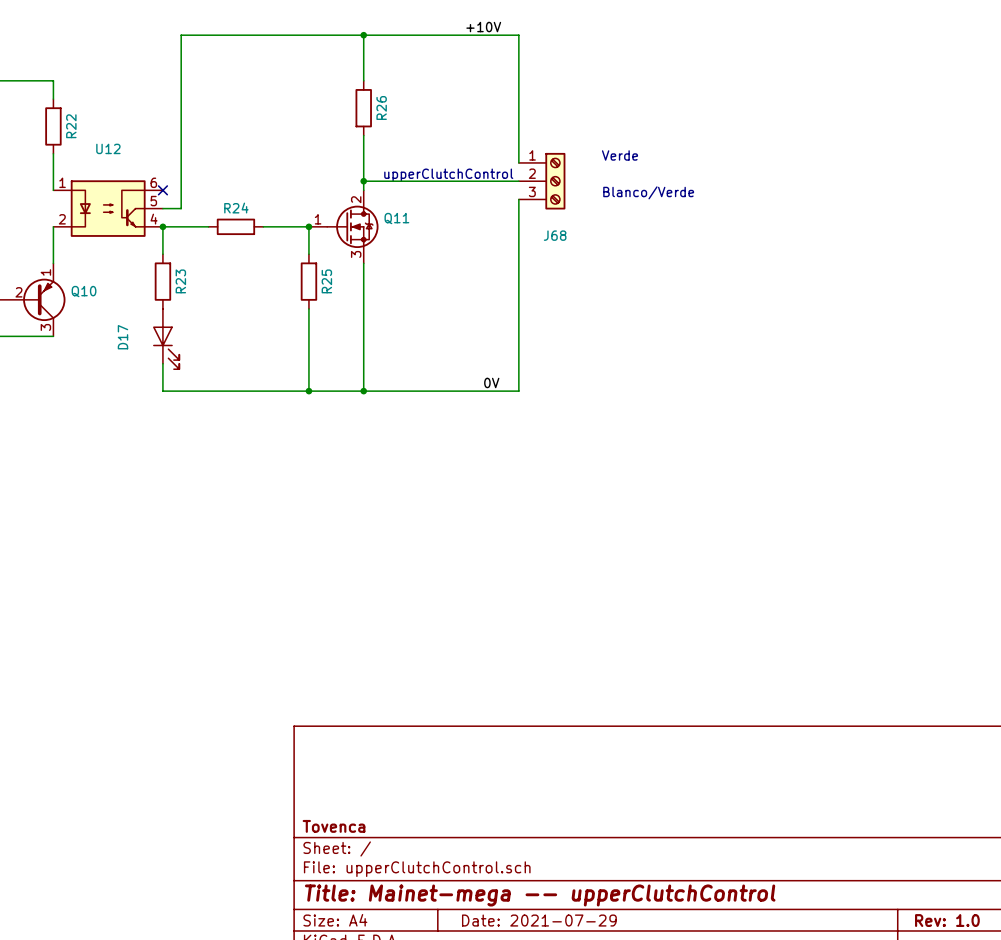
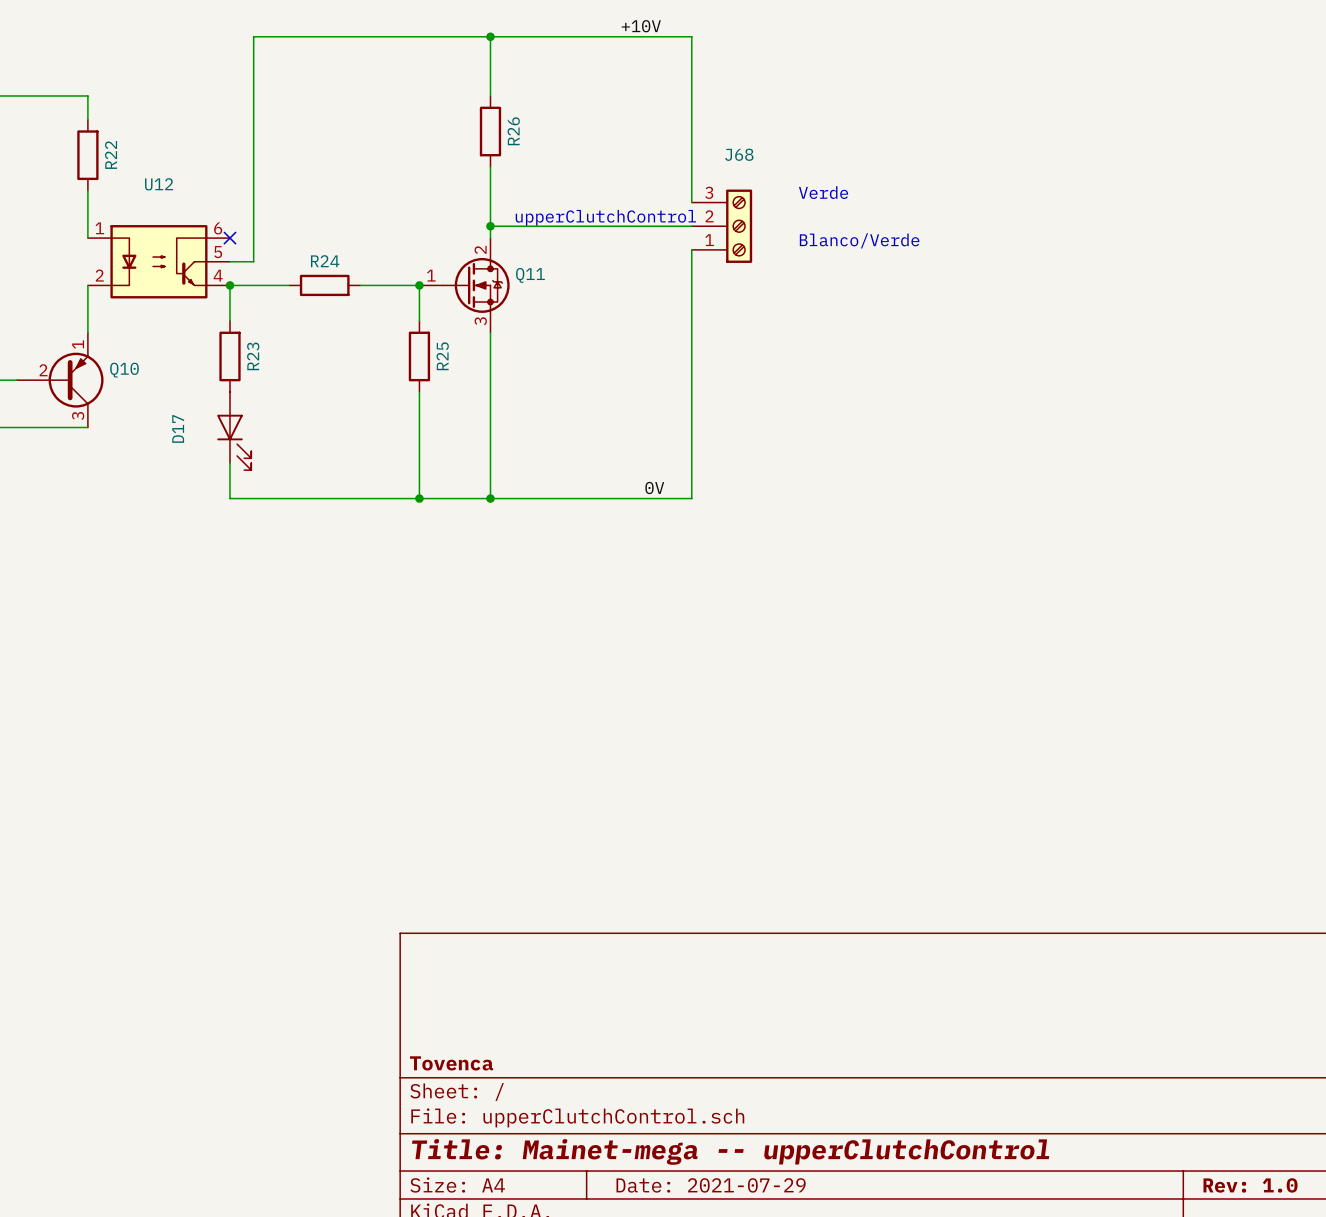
J68 flip: as is (555, 181) -> up-down (739, 226)

